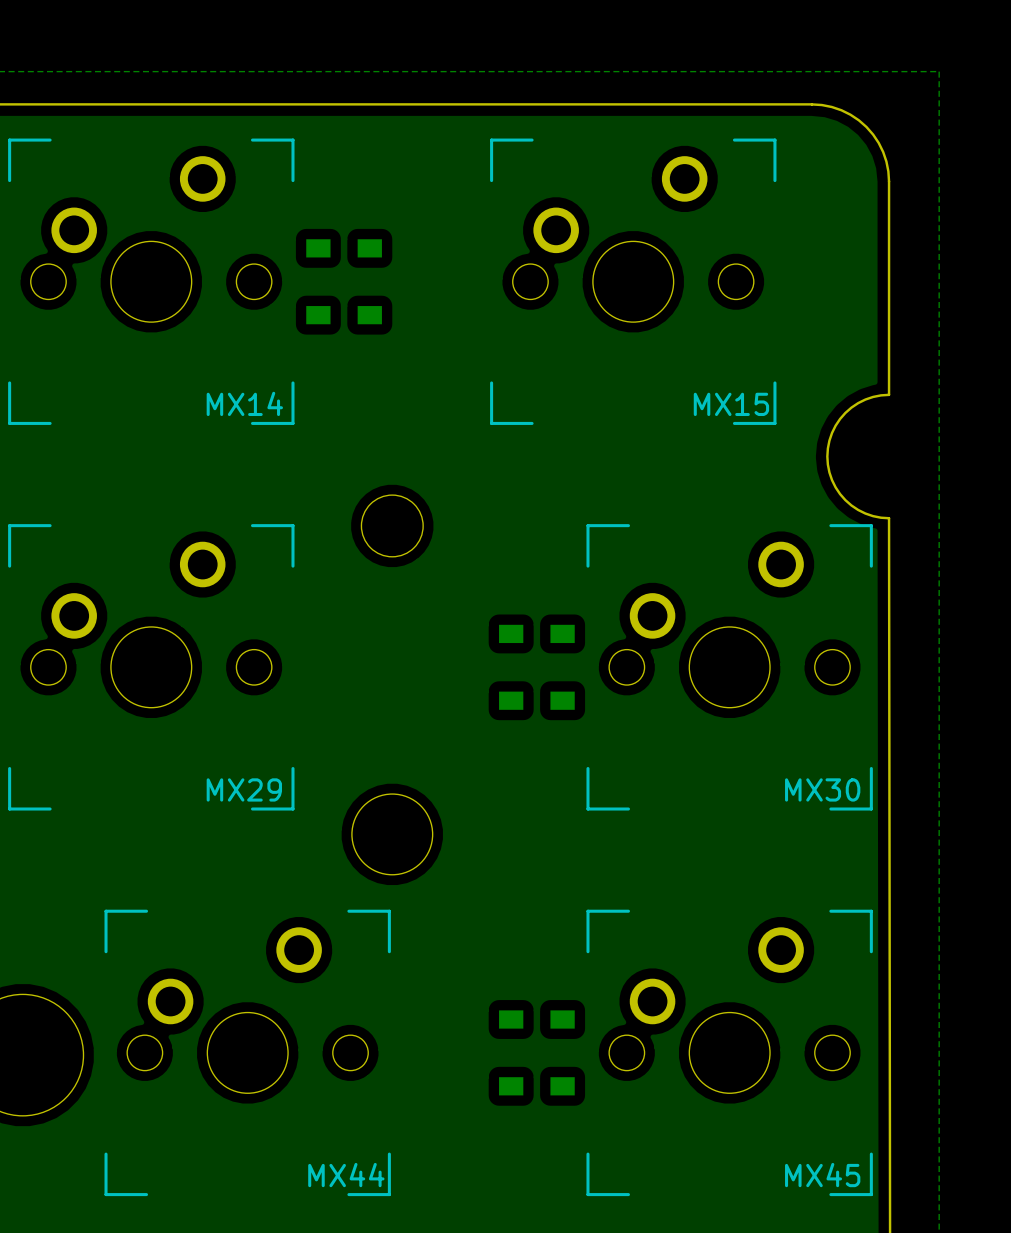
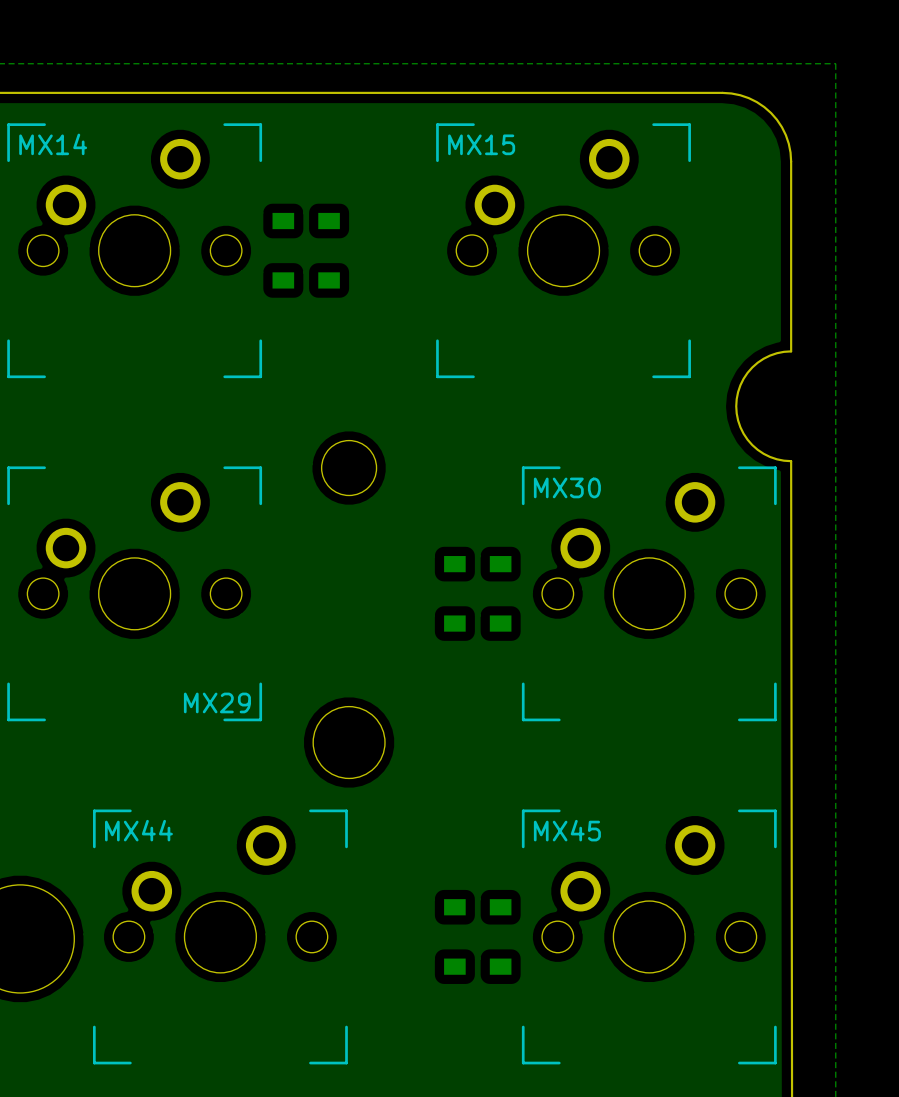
MX14 name position: MX14 (244, 403) -> MX14 (53, 144)
MX15 name position: MX15 (731, 404) -> MX15 (481, 144)
MX30 name position: MX30 (822, 789) -> MX30 (567, 487)
MX44 name position: MX44 (346, 1175) -> MX44 (138, 830)
MX45 name position: MX45 (822, 1175) -> MX45 (567, 830)

